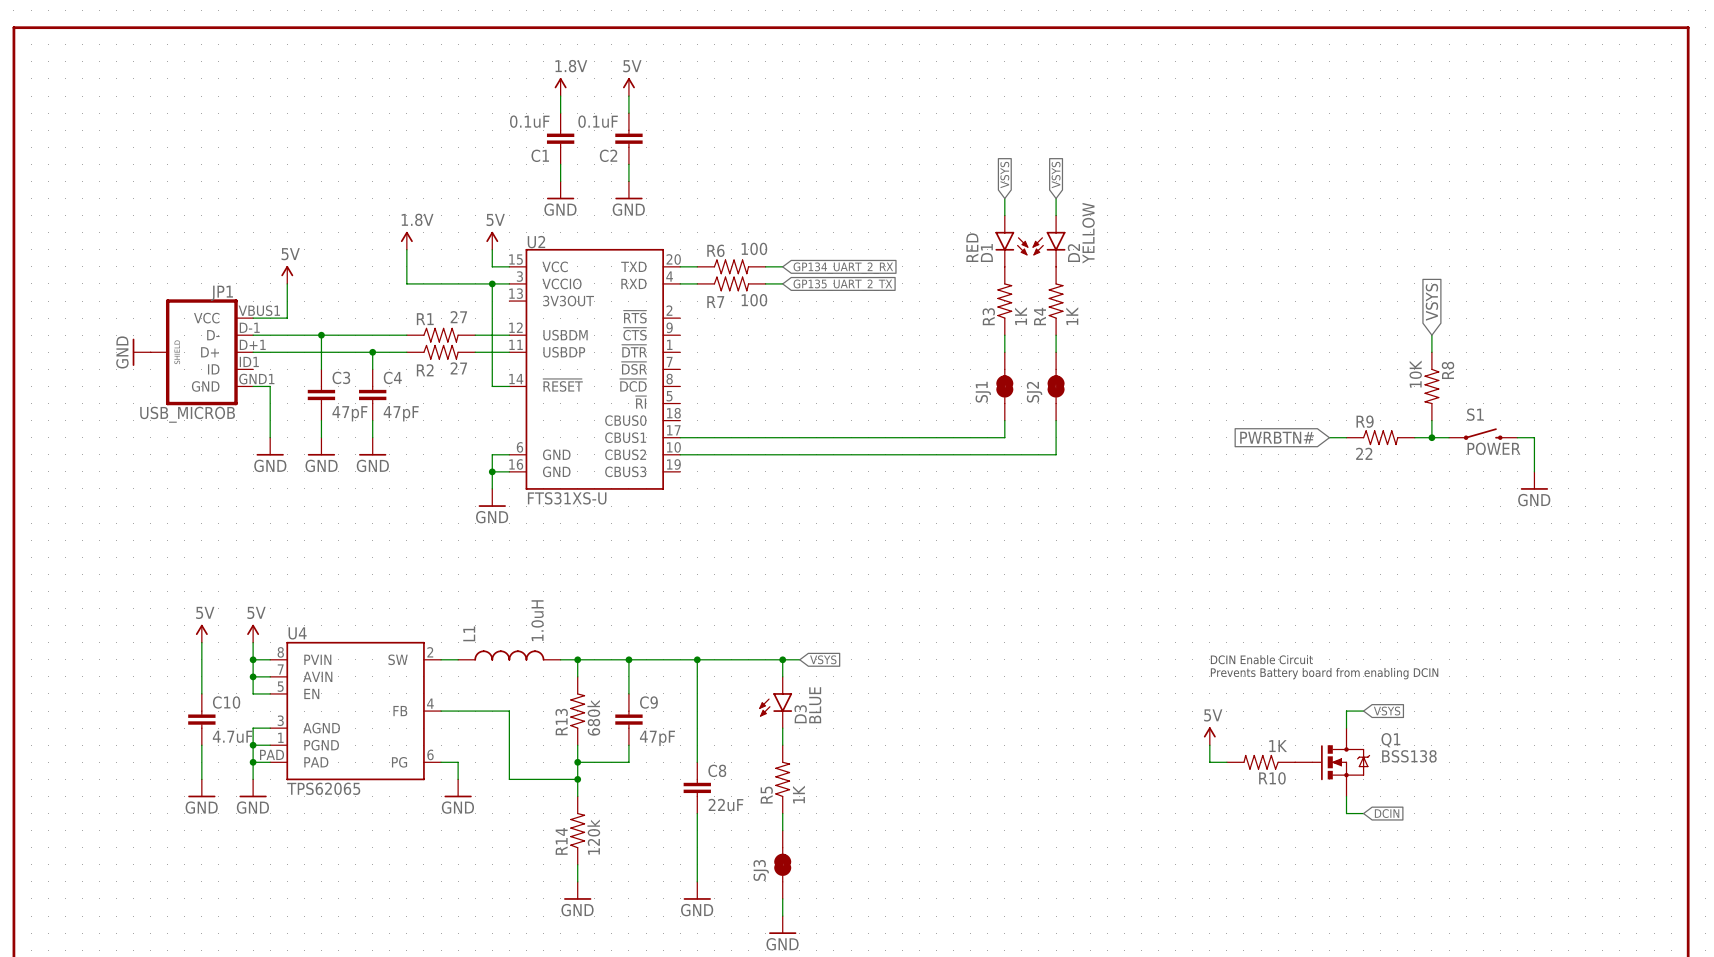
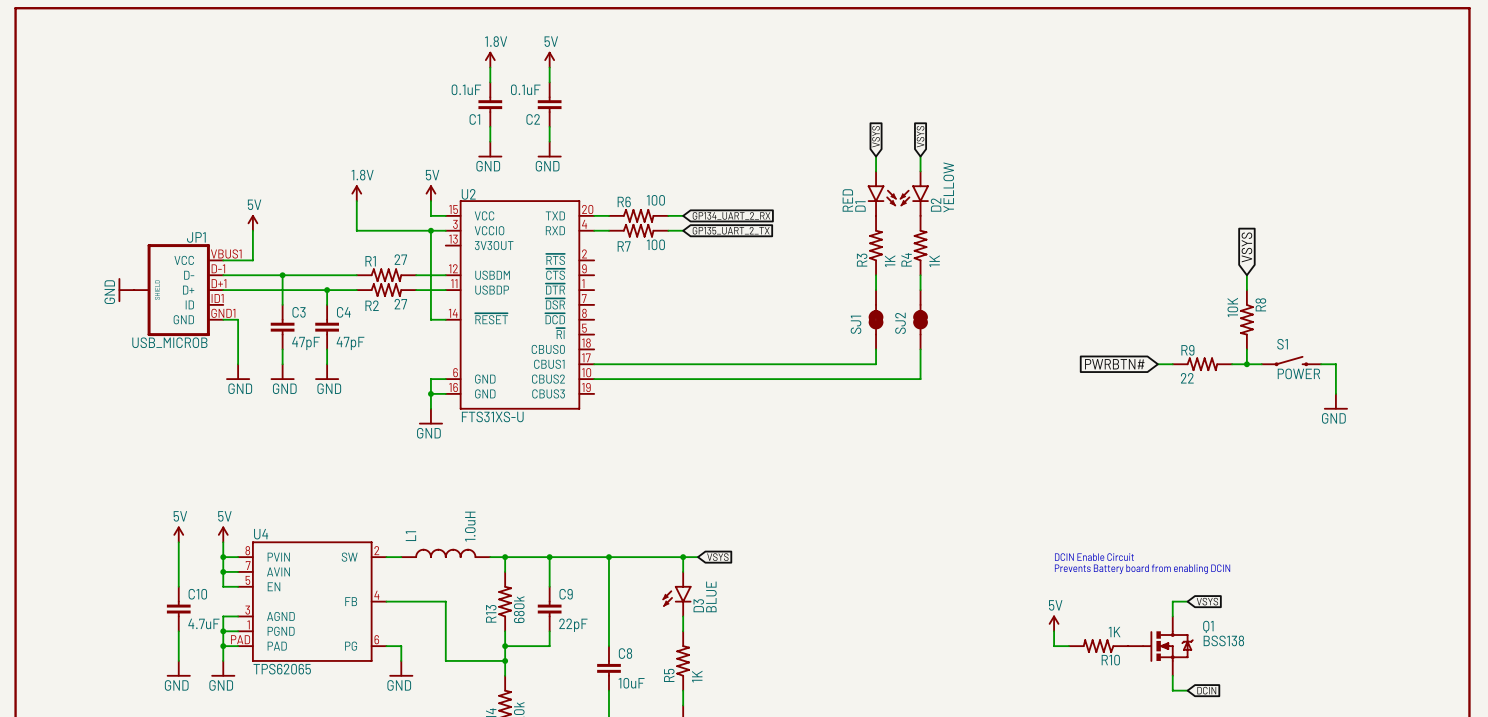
C9 value: 47pF (657, 738) -> 22pF (573, 625)
C8 value: 22uF (725, 805) -> 10uF (631, 683)

